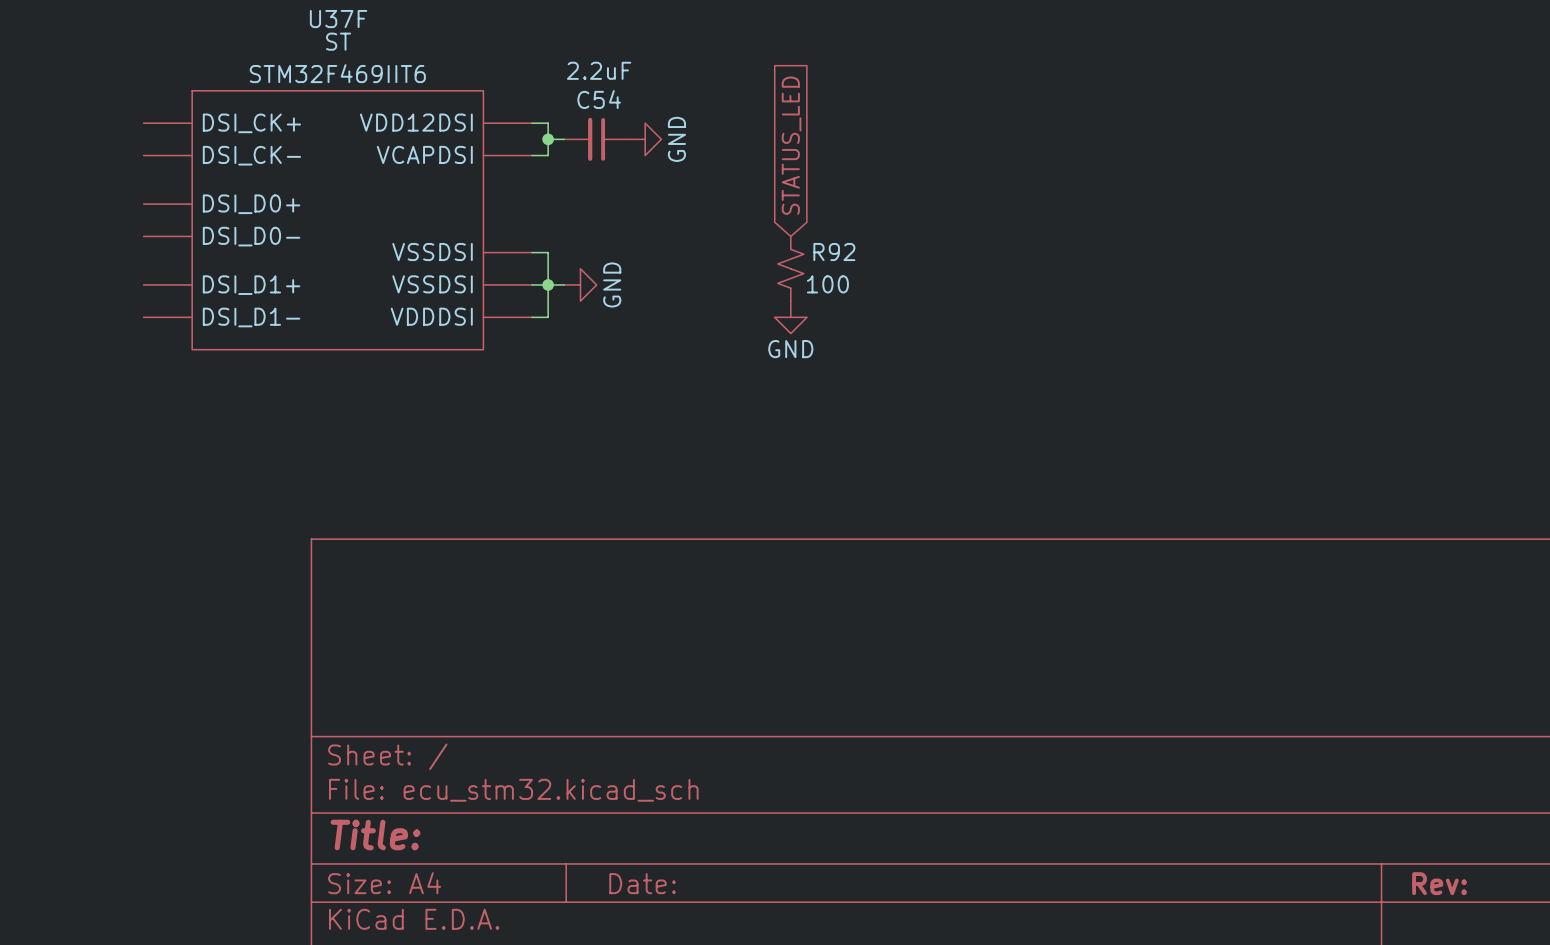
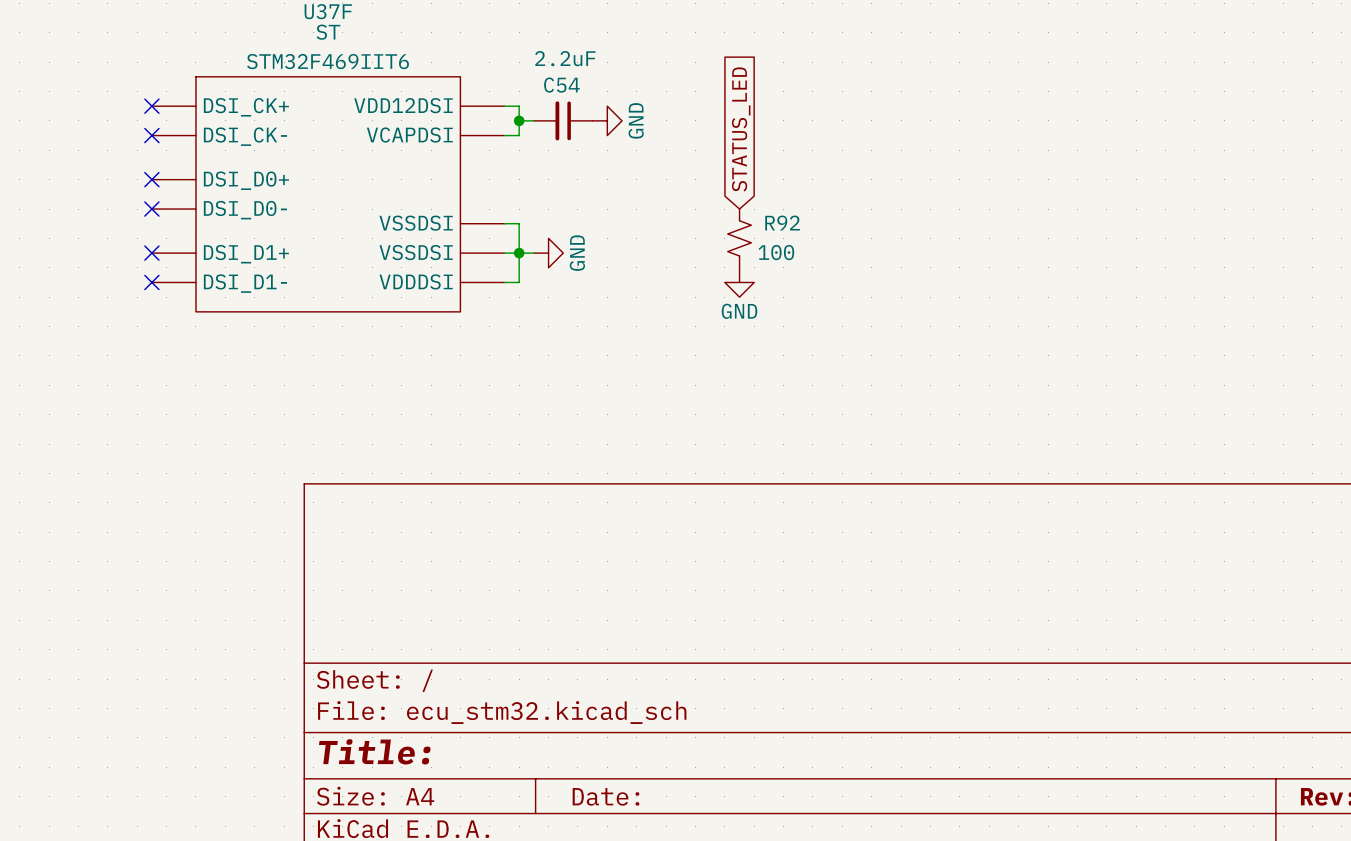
no-connect mark: none -> (151, 106)
no-connect mark: none -> (151, 135)
no-connect mark: none -> (151, 179)
no-connect mark: none -> (151, 209)
no-connect mark: none -> (151, 253)
no-connect mark: none -> (151, 282)

